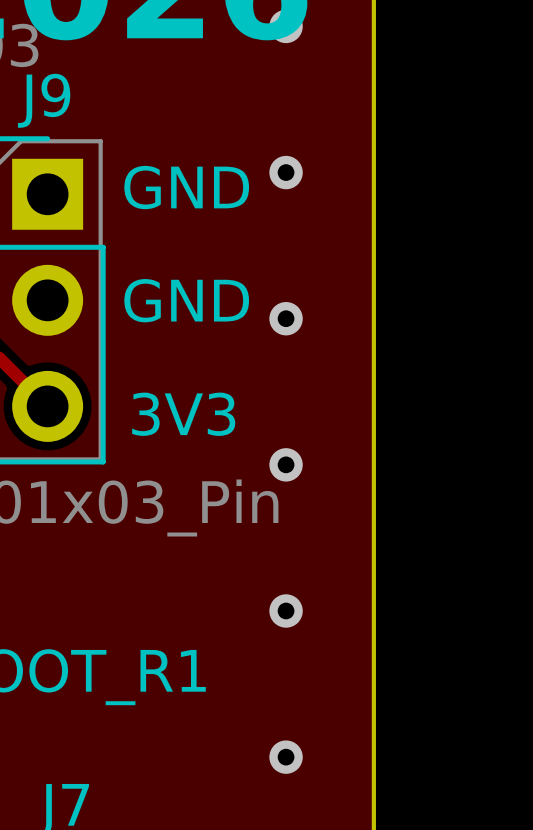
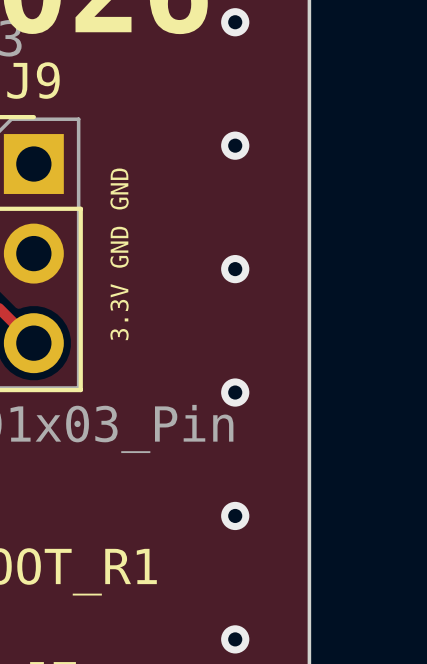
text: GND (186, 187) -> none
text: none -> 3.3V GND GND (119, 254)
text: GND (186, 300) -> none
text: 3V3 (183, 414) -> none

